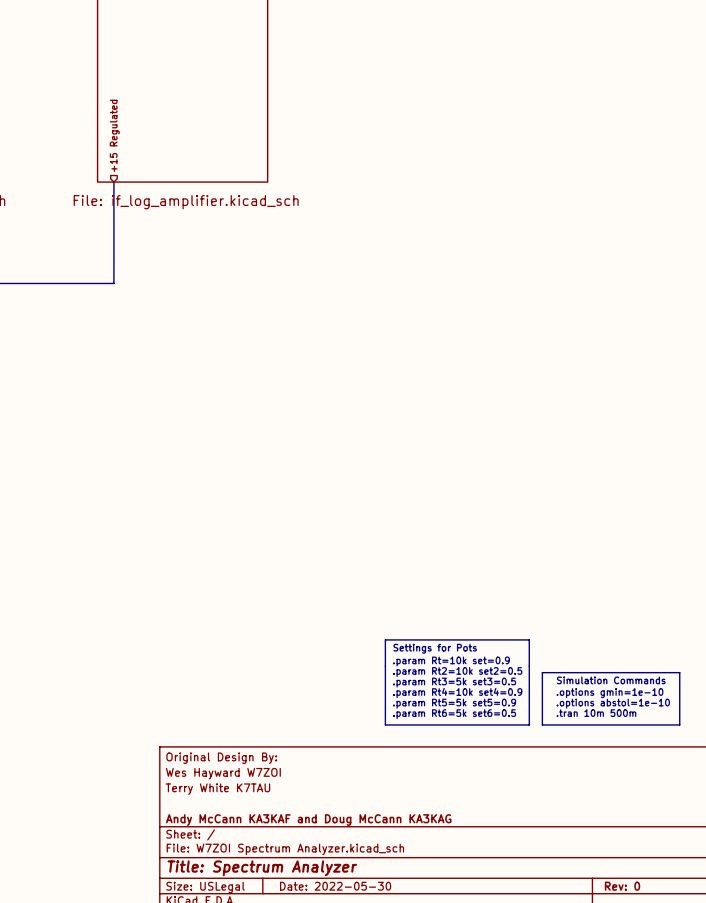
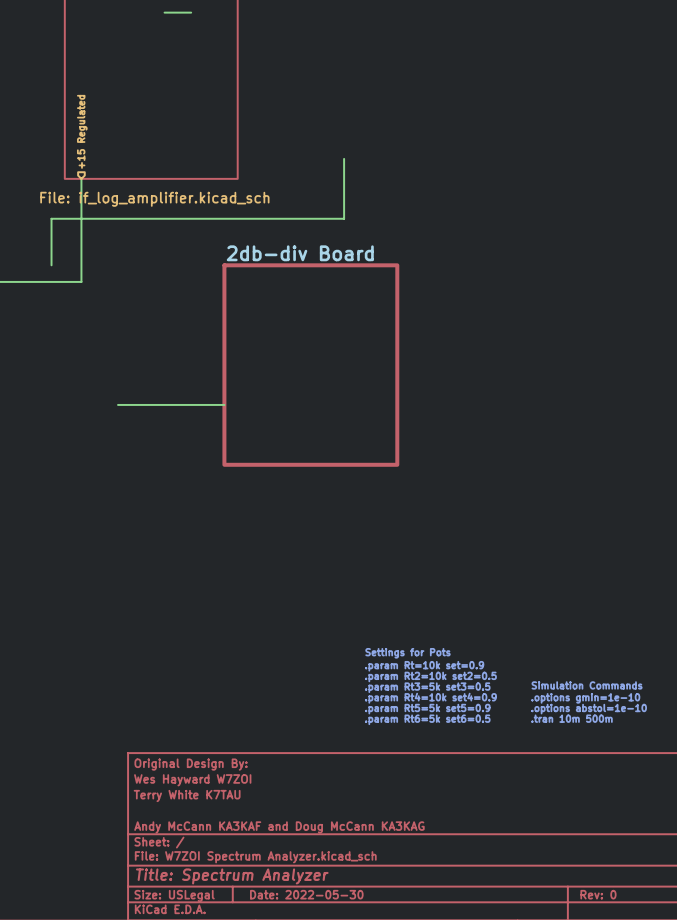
wire: none -> (164, 12) (191, 12)
wire: none -> (344, 158) (344, 218) (51, 218) (51, 265)
sheet 2db-div Board: none -> (310, 365)
wire: none -> (118, 404) (224, 404)
line: (385, 639) (385, 724) (529, 724) (529, 639) (385, 639) -> none
line: (542, 672) (679, 672) (679, 724) (542, 724) (542, 672) -> none

